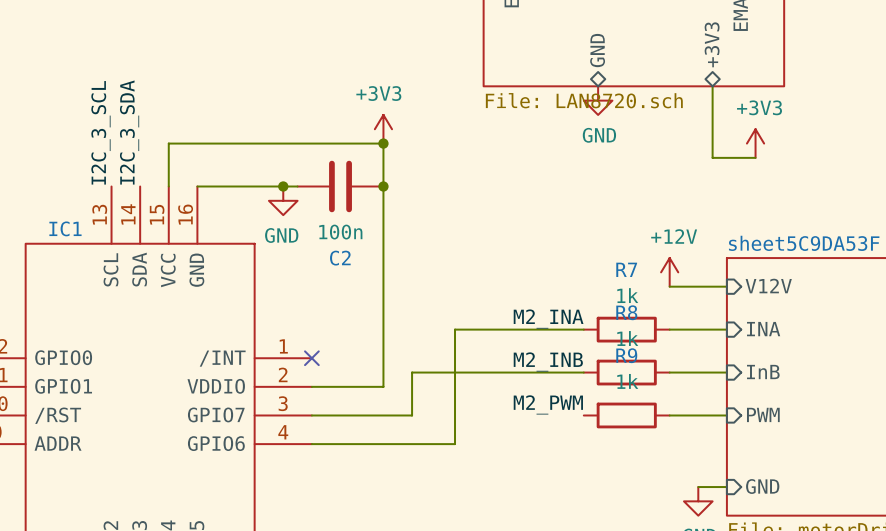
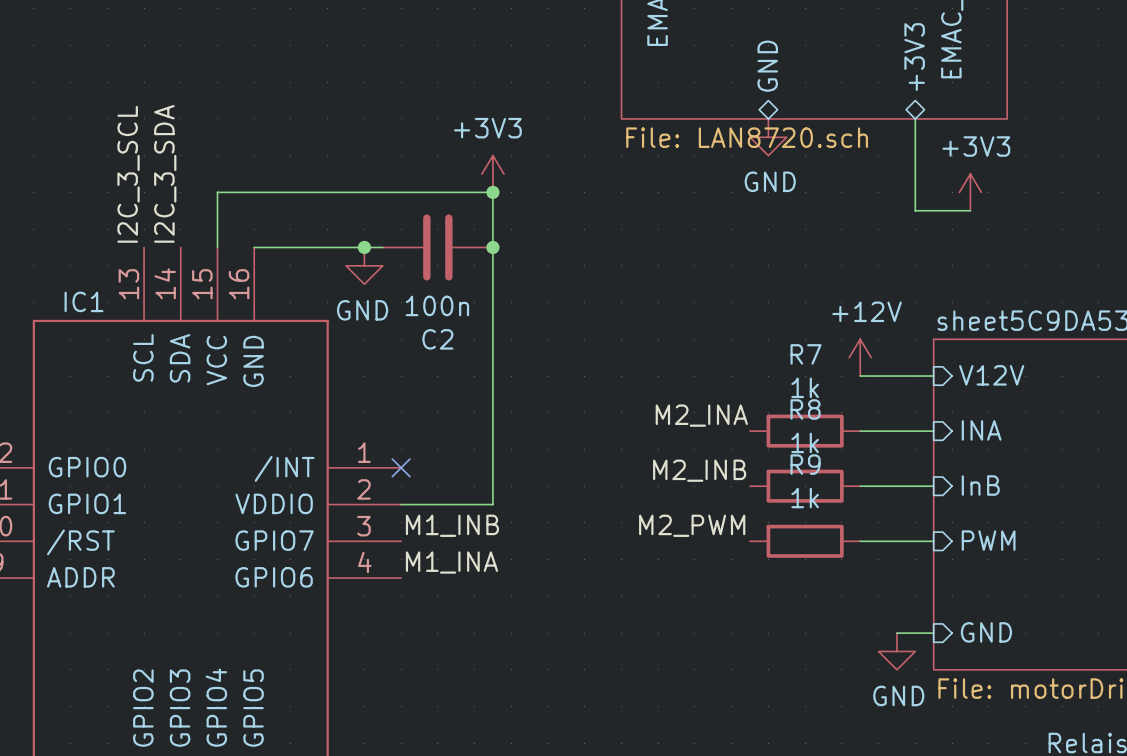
wire: (583, 329) (455, 329) (455, 444) (311, 444) -> none
wire: (583, 372) (412, 372) (412, 415) (311, 415) -> none
label: none -> M1_INB (452, 525)
label: none -> M1_INA (451, 562)

